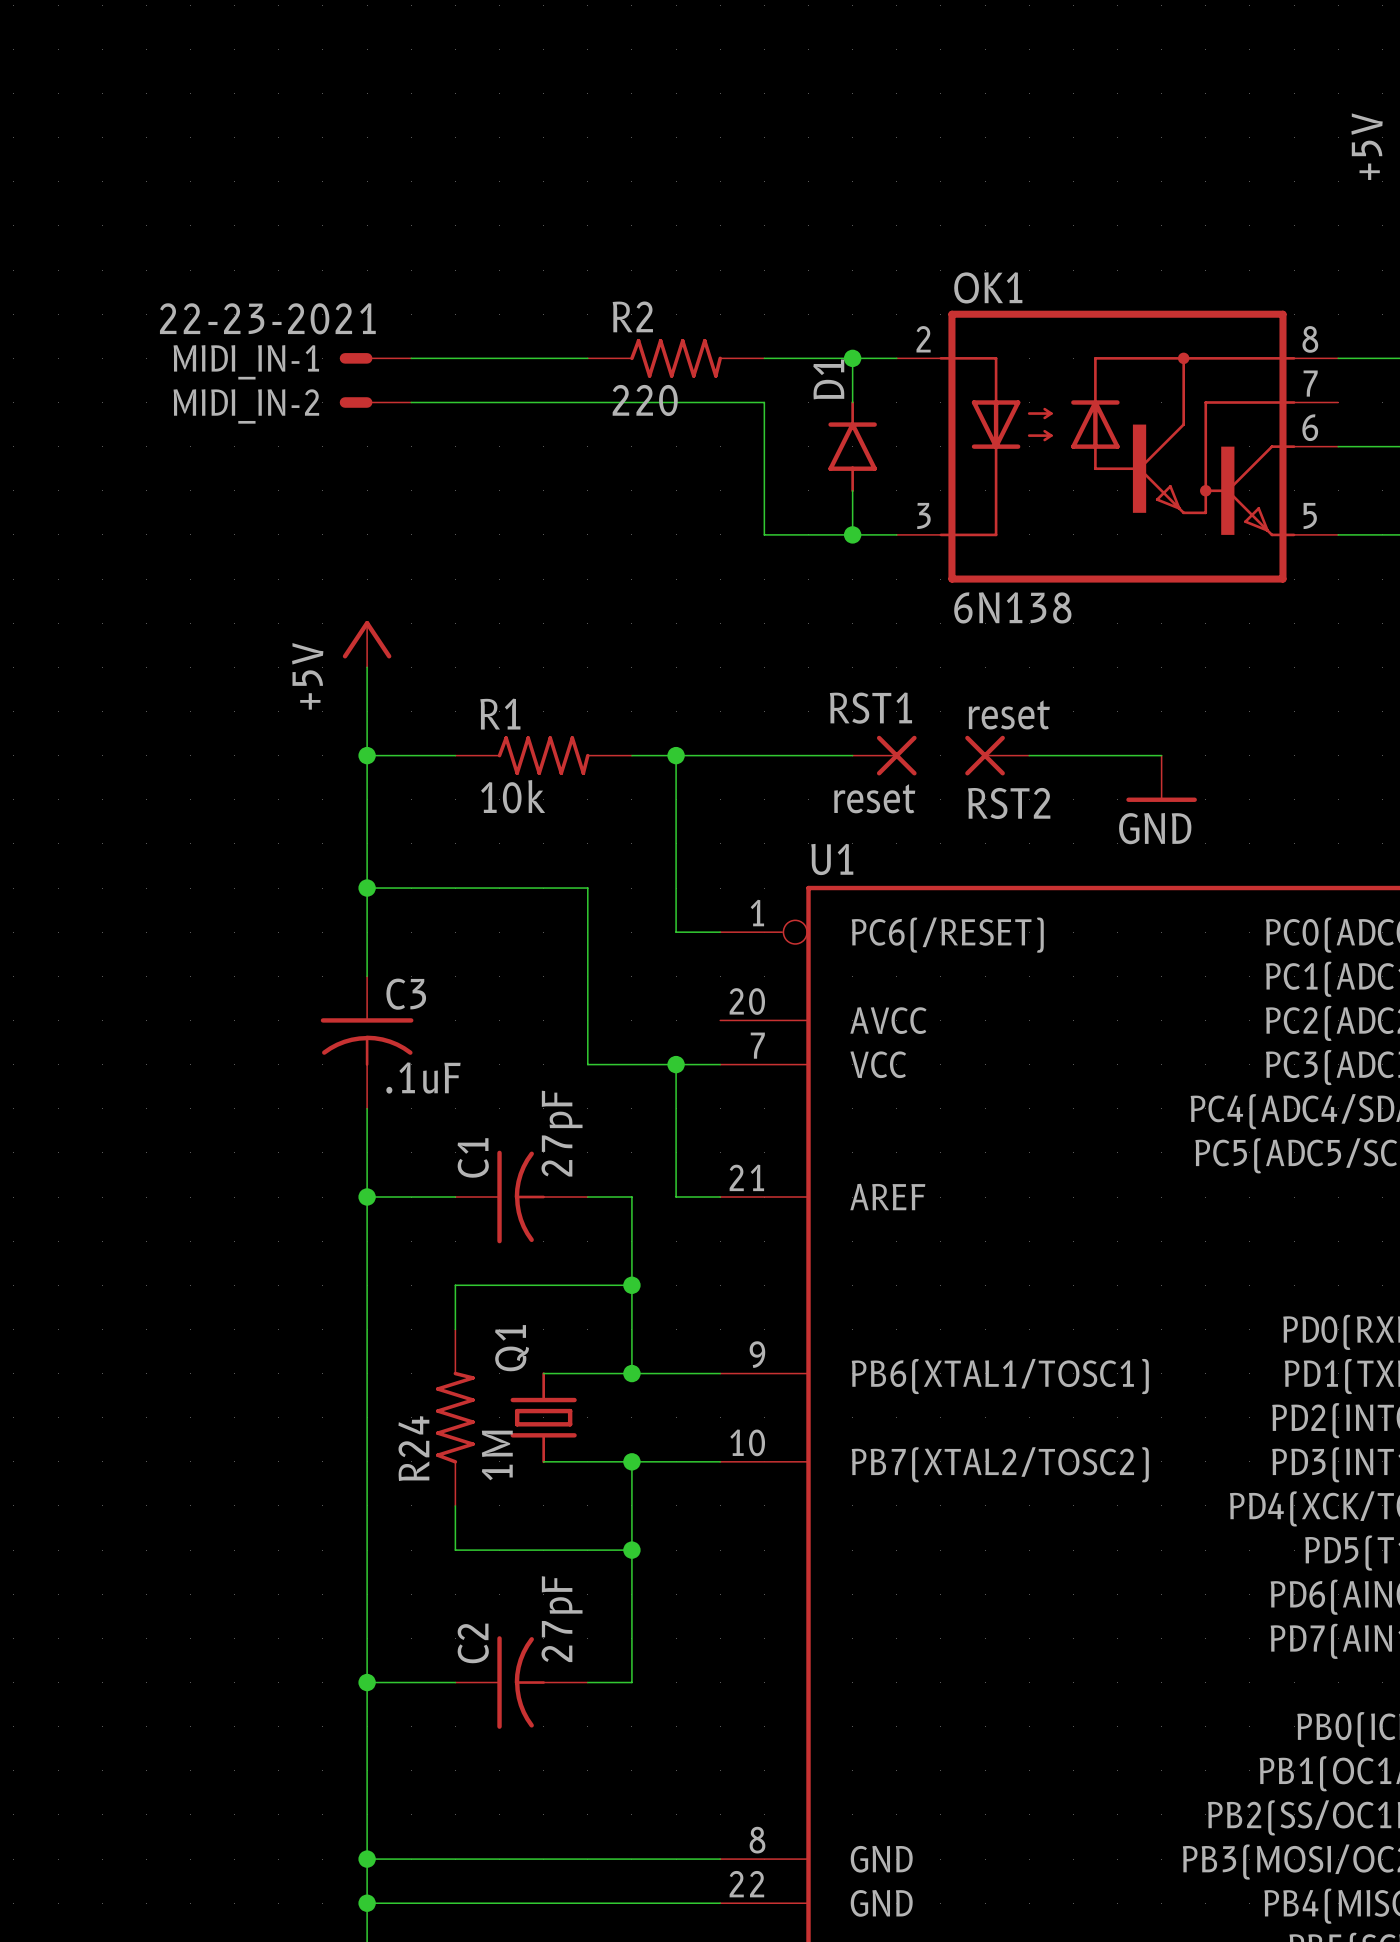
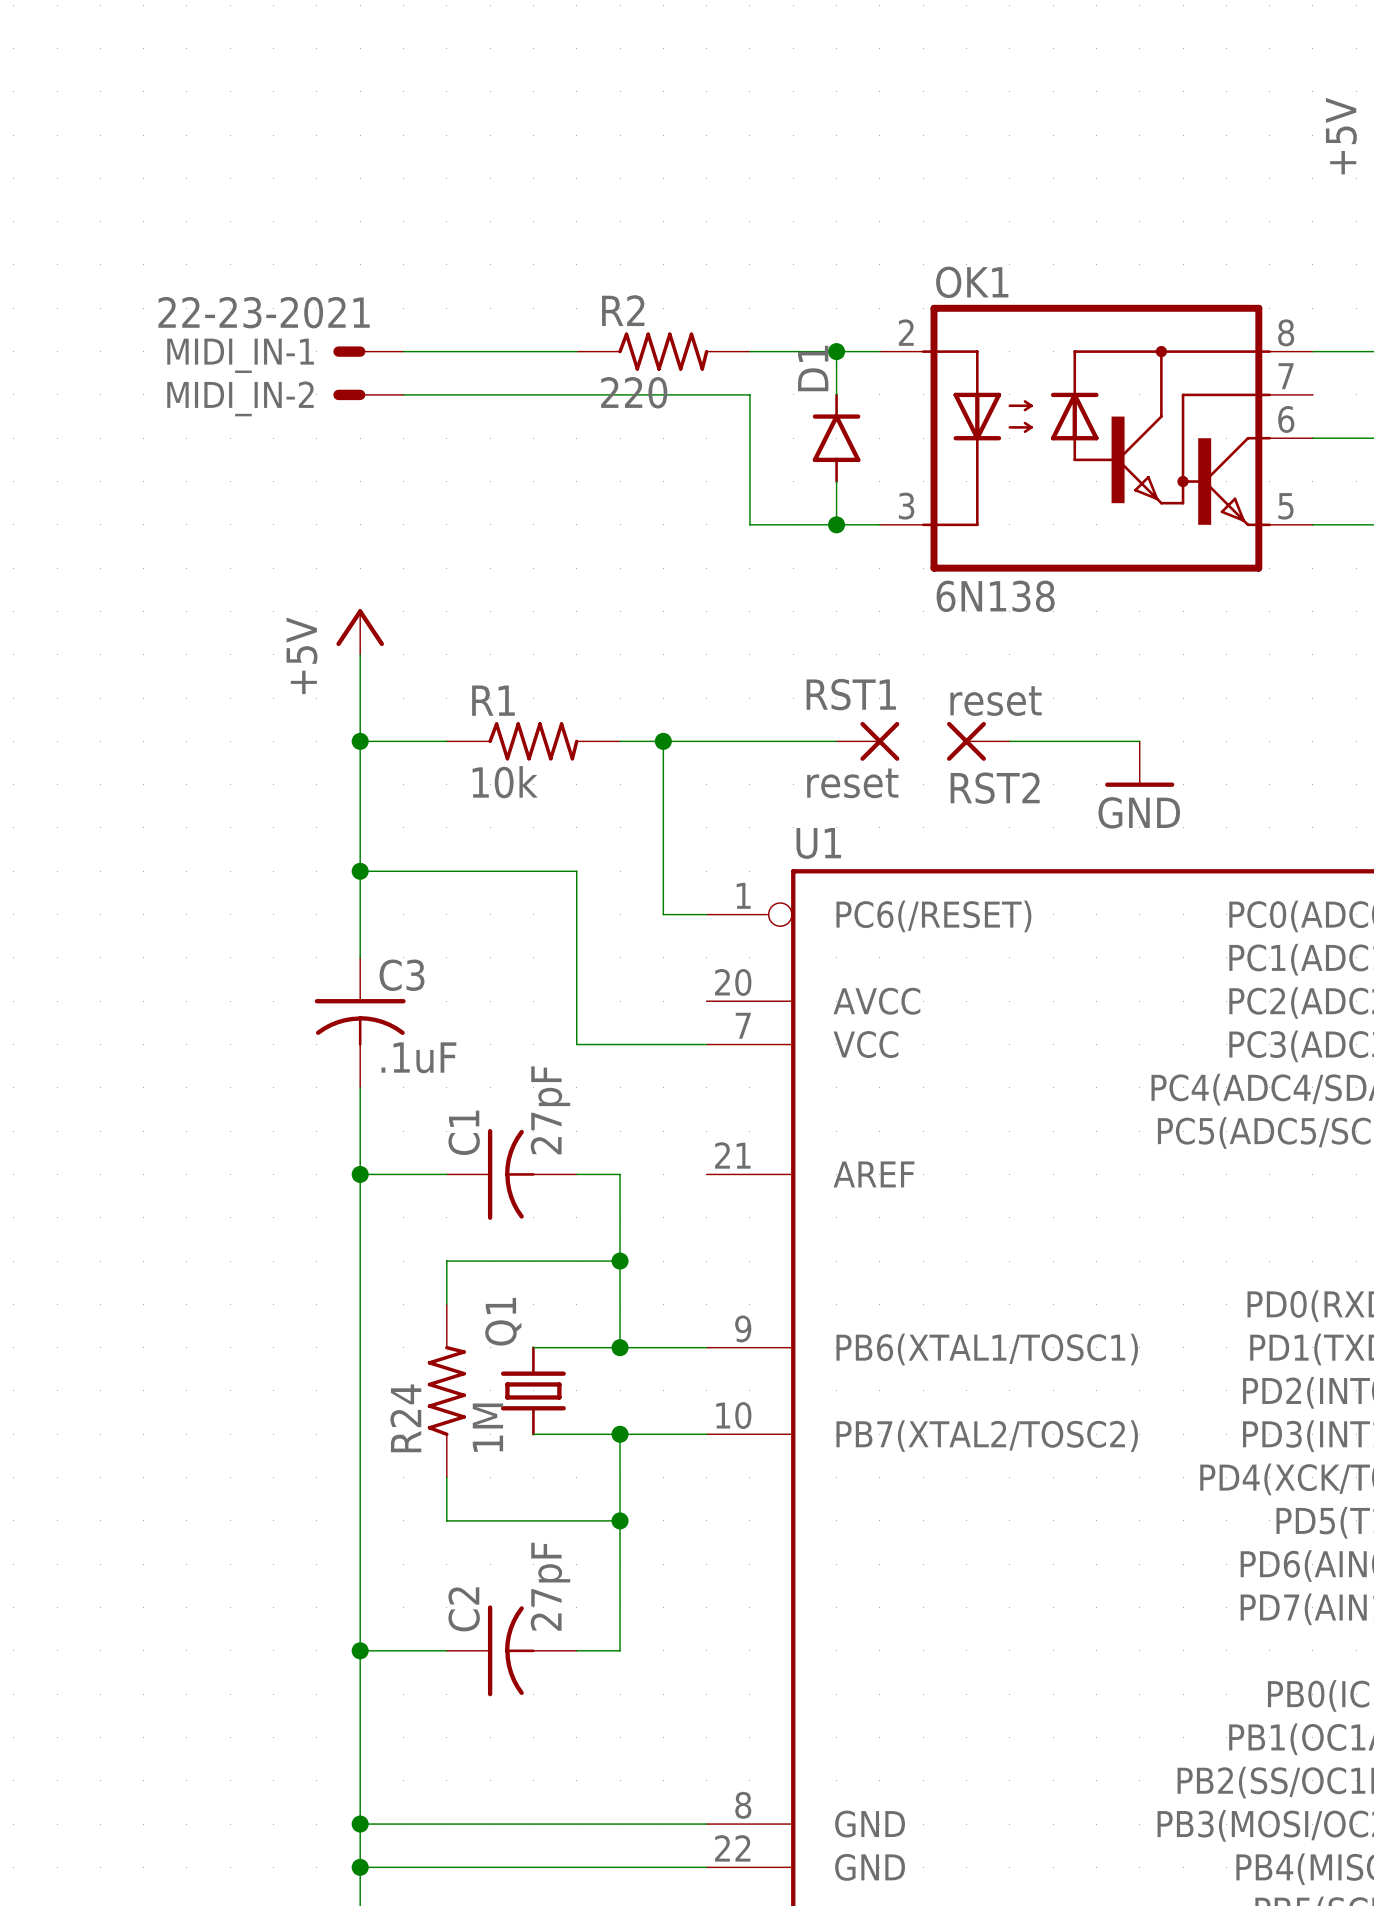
wire: (676, 1064) (676, 1197) (720, 1197) -> none
junction: (676, 1064) -> none

